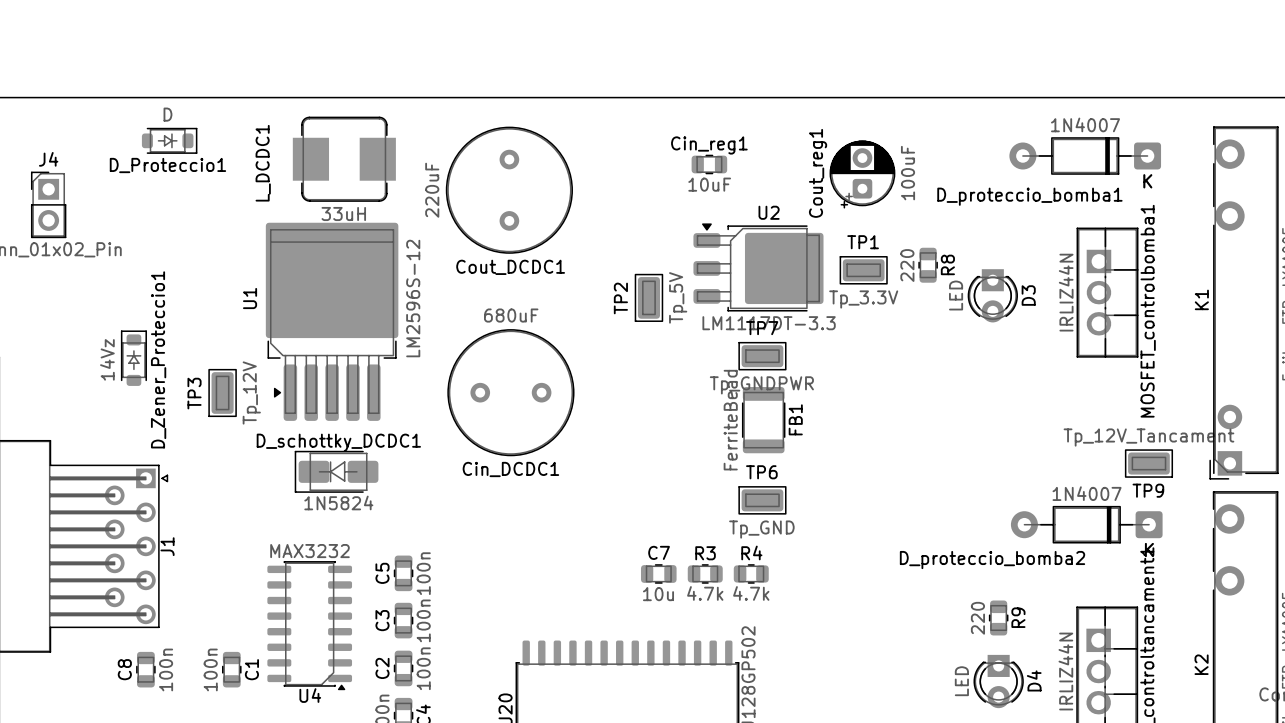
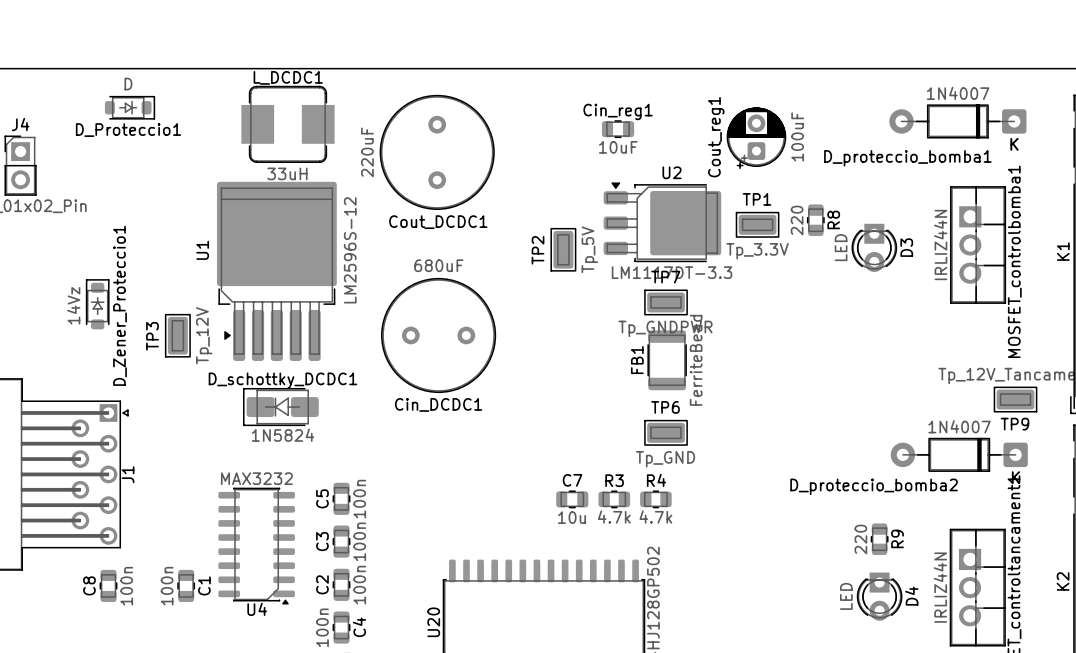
L_DCDC1 name rotation: 0° (263, 163) -> 90° clockwise (288, 77)
L_DCDC1 name position: L_DCDC1 (263, 163) -> L_DCDC1 (288, 77)
FB1 name position: FB1 (795, 419) -> FB1 (637, 360)
FB1 value position: FerriteBead (730, 420) -> FerriteBead (696, 360)

